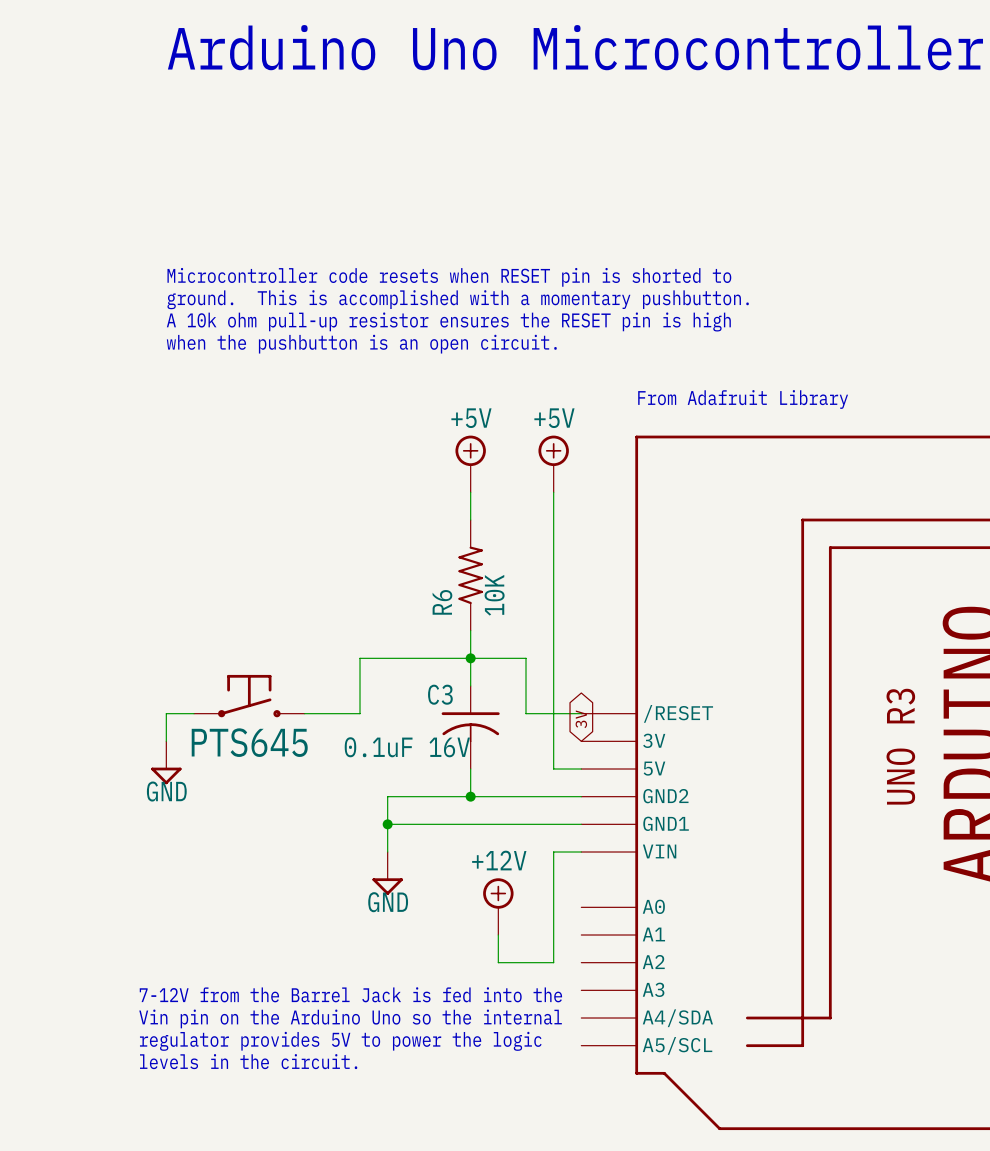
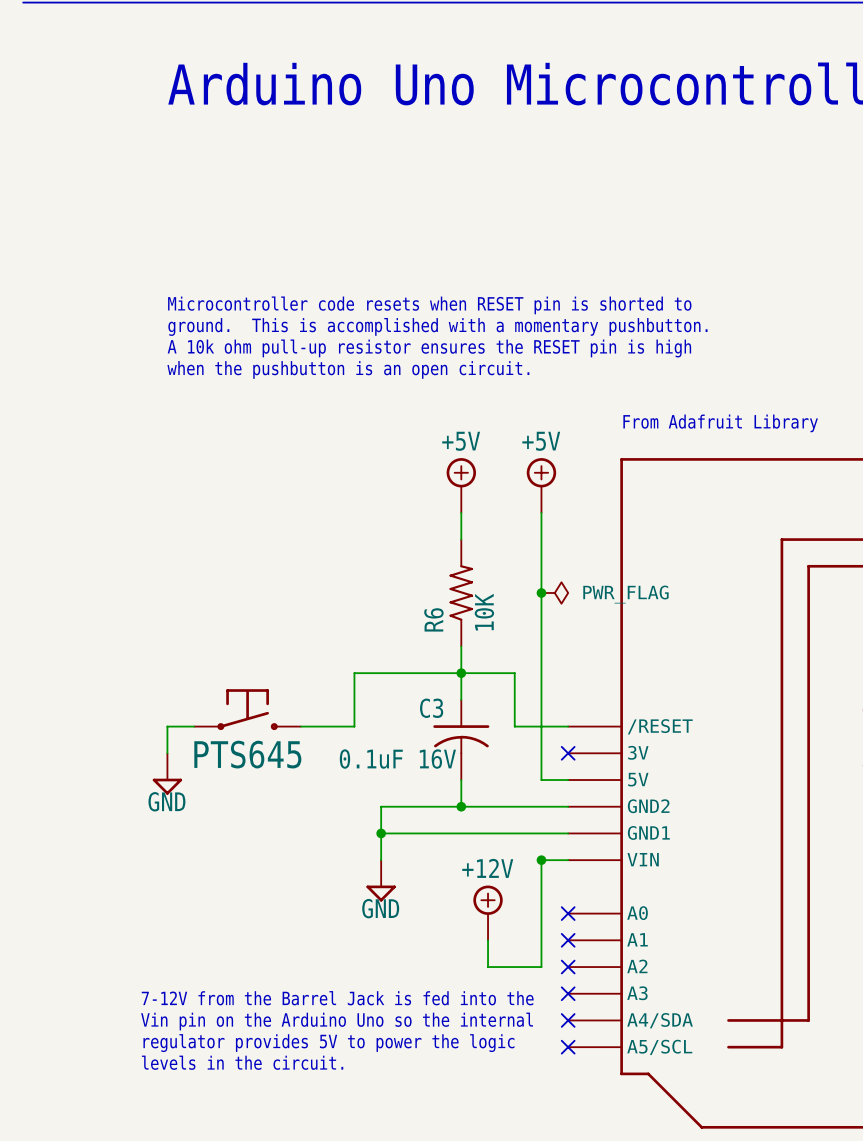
junction: none -> (541, 593)
power symbol: none -> PWR_FLAG (554, 593)
global label: 3V (581, 719) -> none
no-connect mark: none -> (568, 753)
junction: none -> (541, 860)
no-connect mark: none -> (568, 913)
no-connect mark: none -> (568, 940)
no-connect mark: none -> (568, 967)
no-connect mark: none -> (568, 993)
no-connect mark: none -> (568, 1020)
no-connect mark: none -> (568, 1047)

